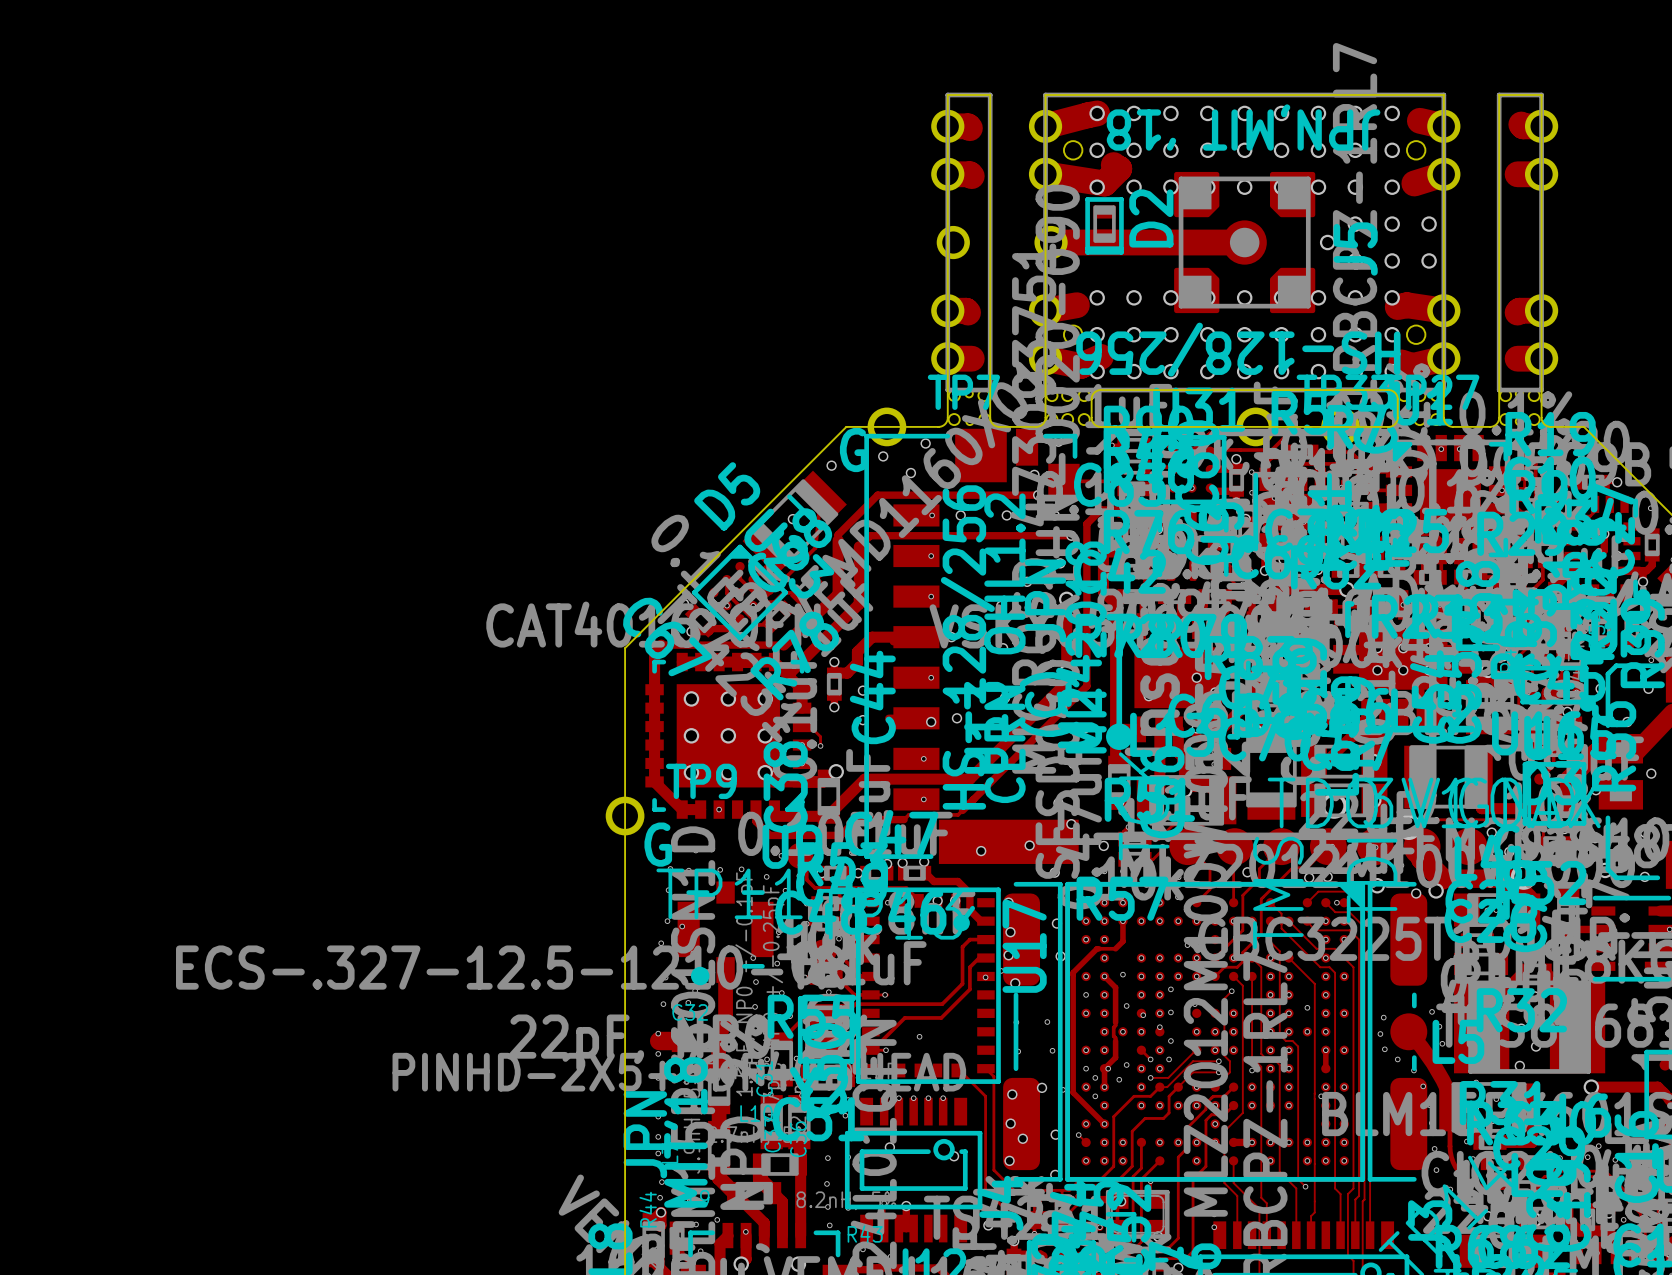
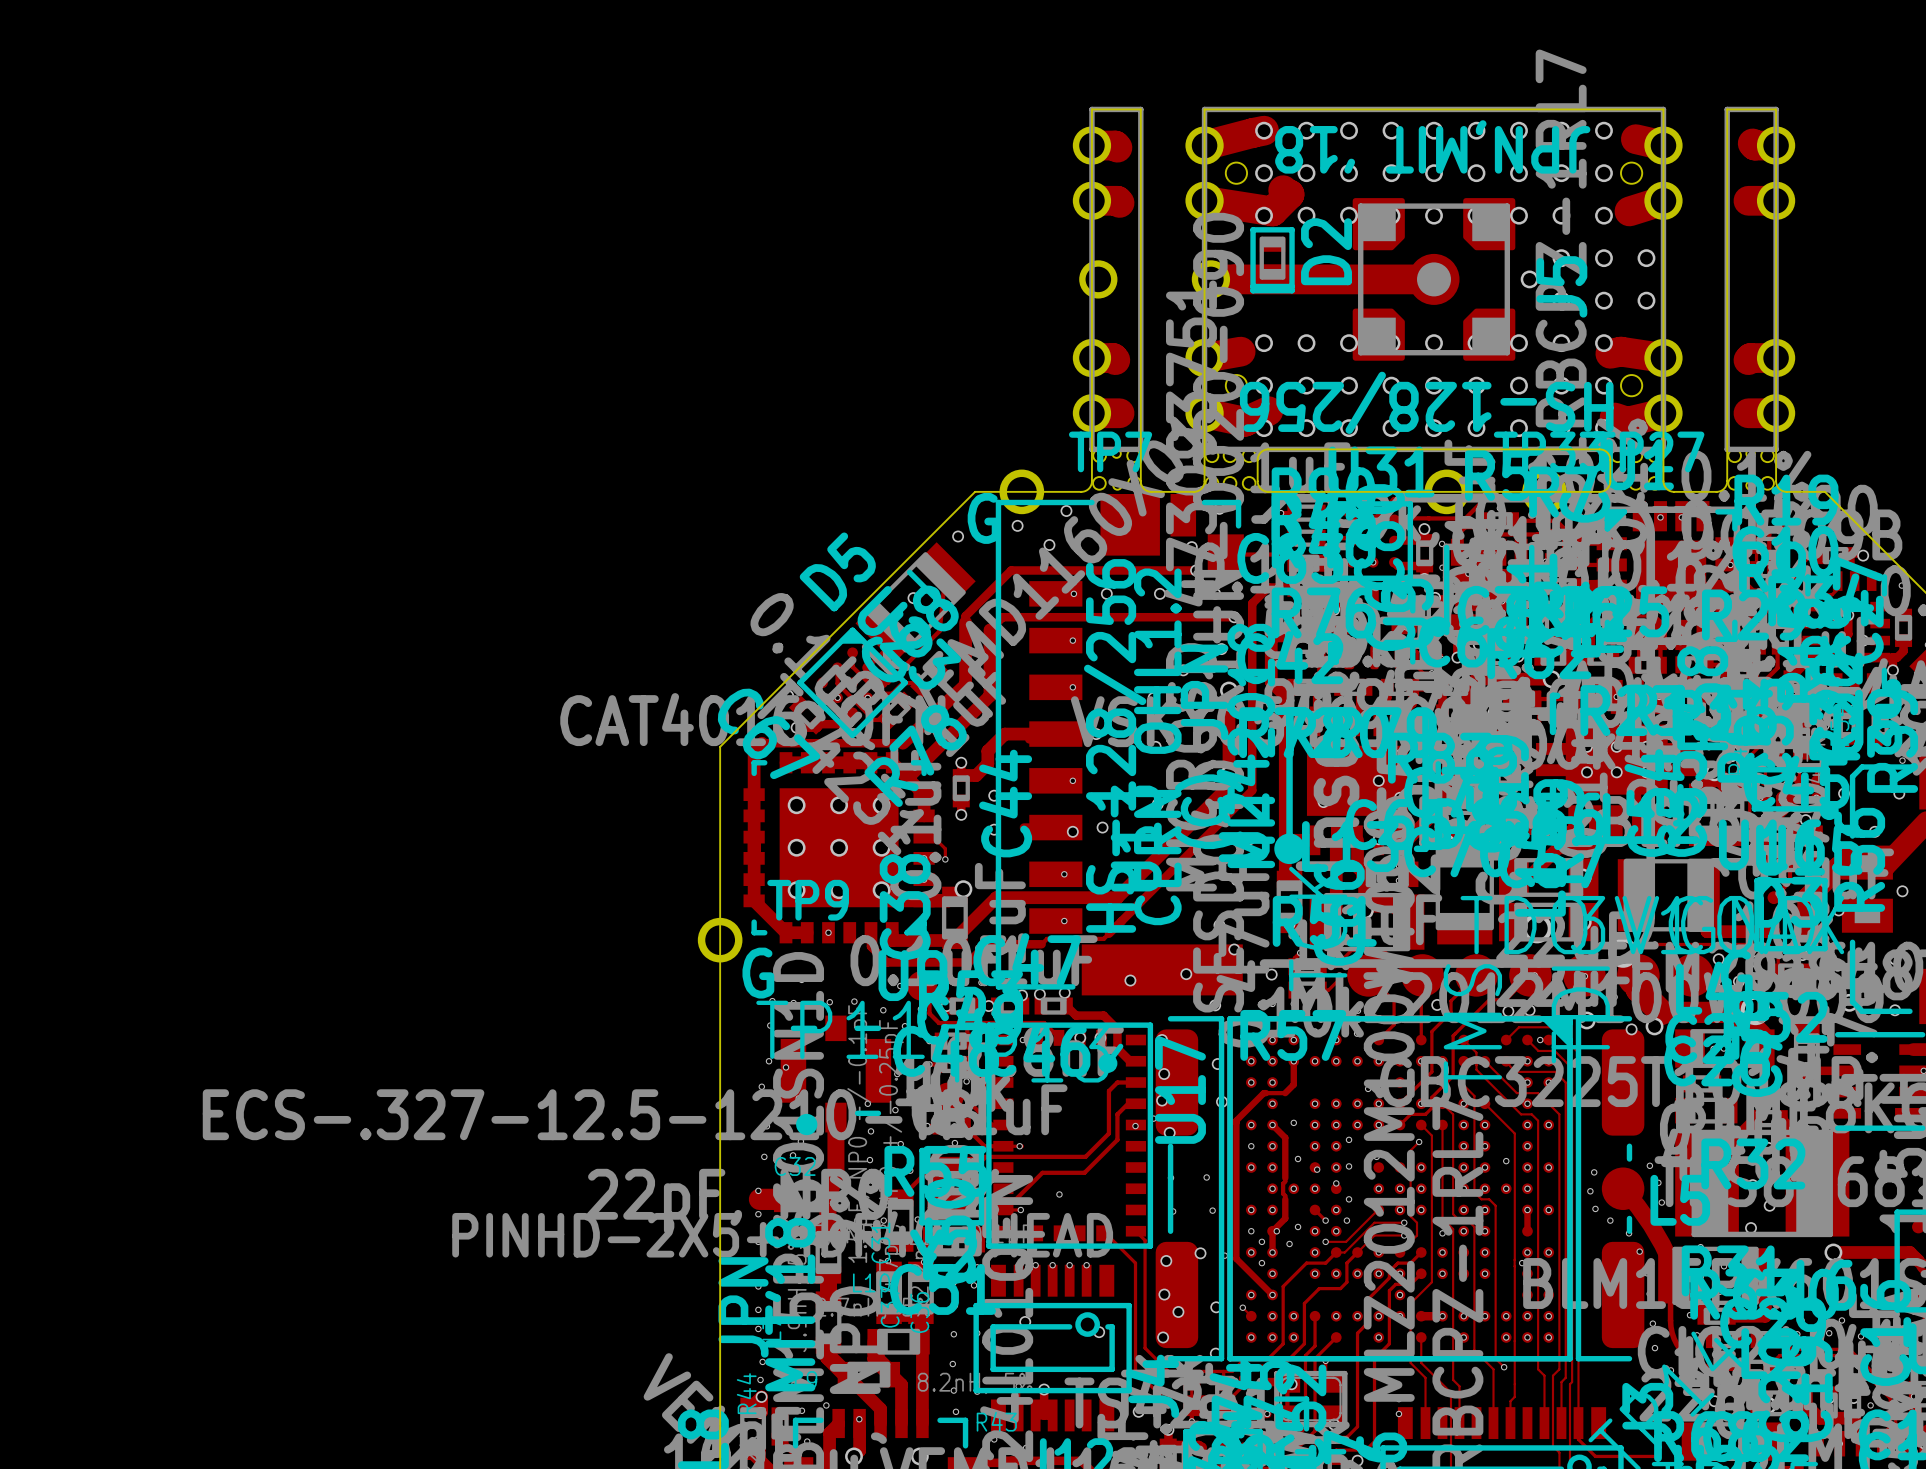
track: none -> (1578, 1423) (1578, 1439) (1595, 1456) (1659, 1456)

